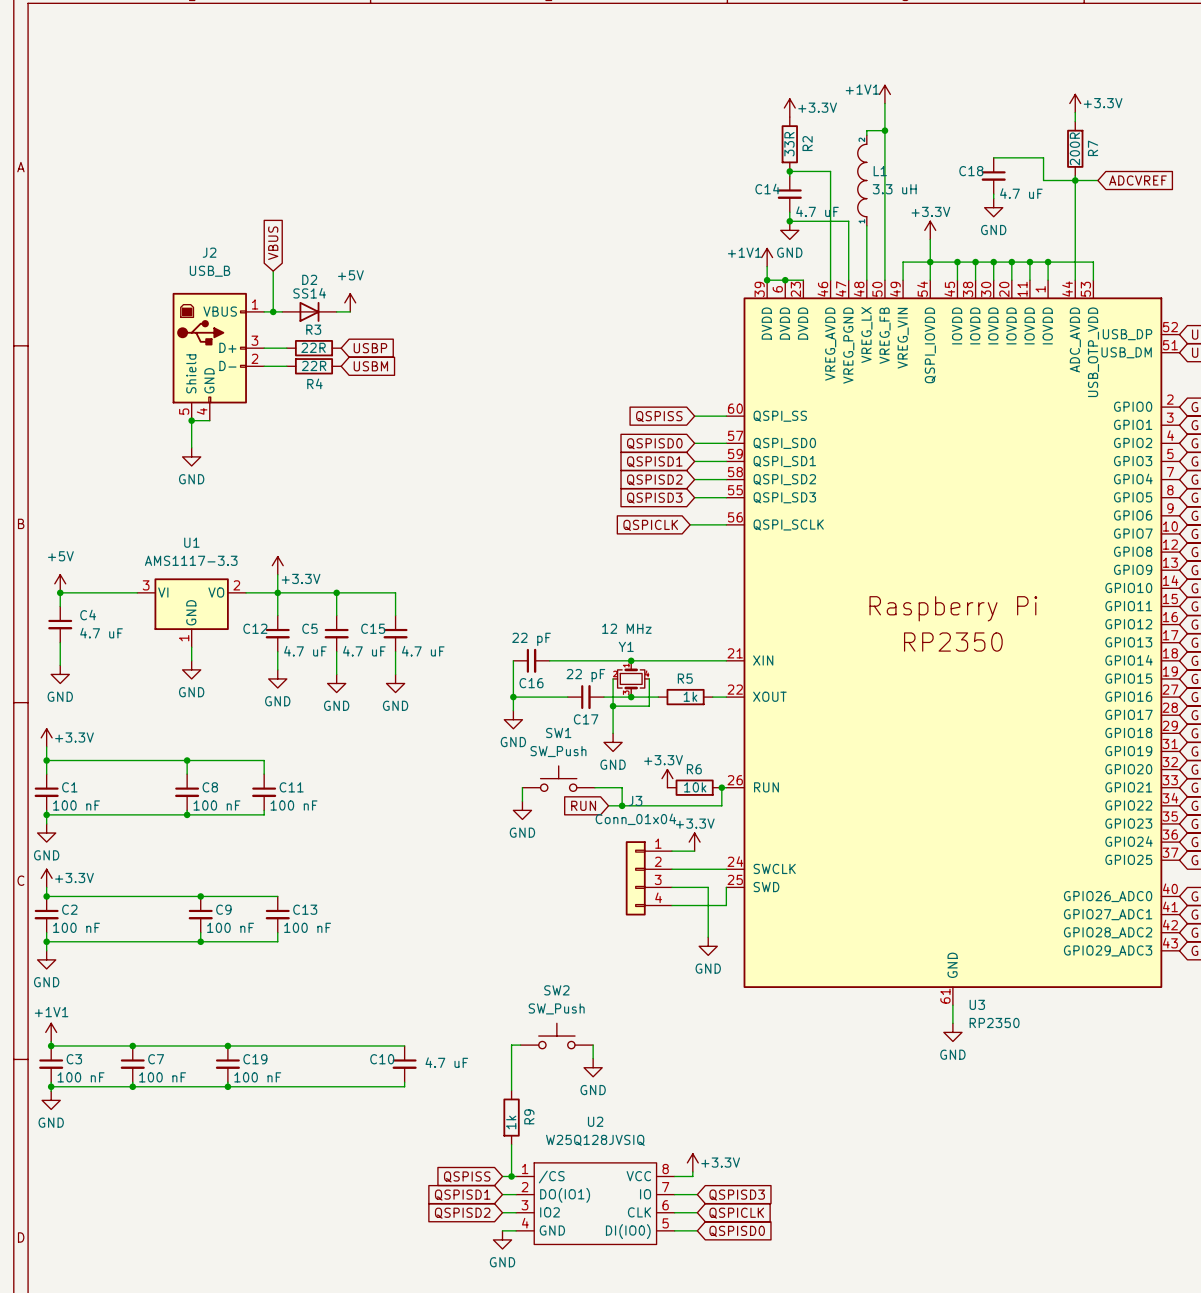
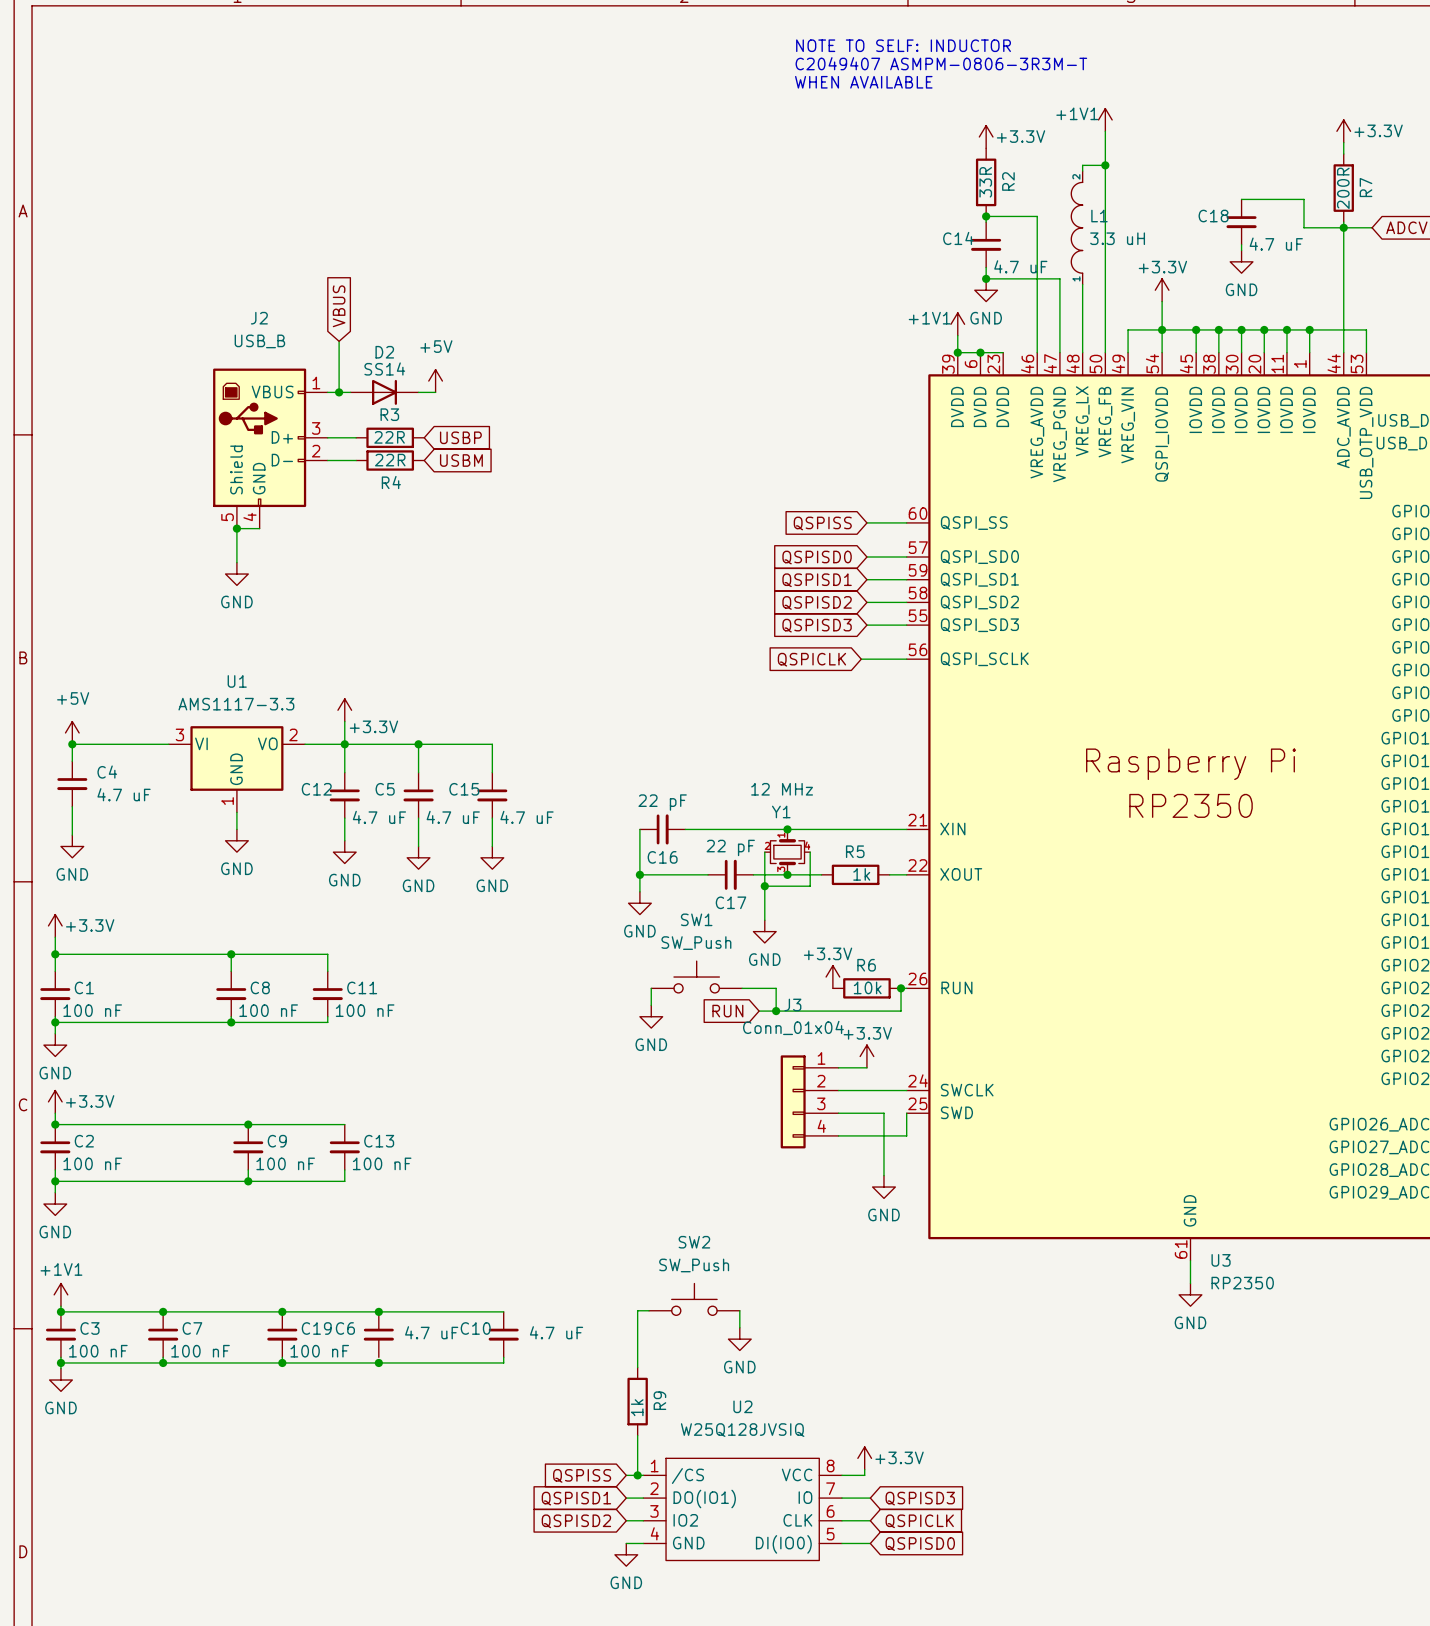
text: none -> NOTE TO SELF: INDUCTOR (903, 45)
text: none -> C2049407 ASMPM-0806-3R3M-T (941, 63)
text: none -> WHEN AVAILABLE (863, 82)
junction: none -> (378, 1311)
C6: none -> 4.7 uF (378, 1334)
junction: none -> (378, 1362)

